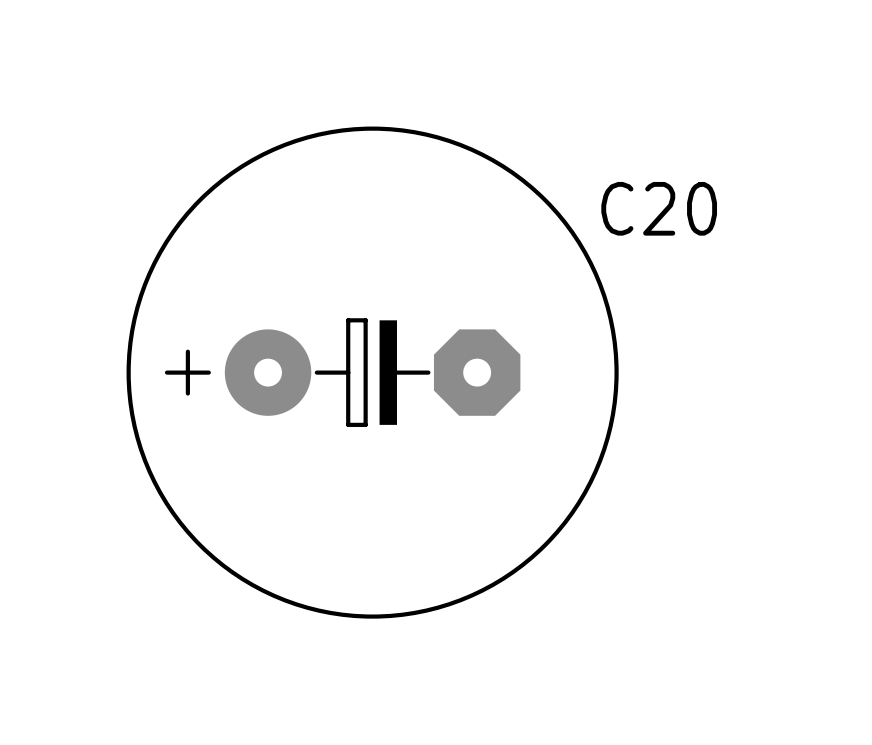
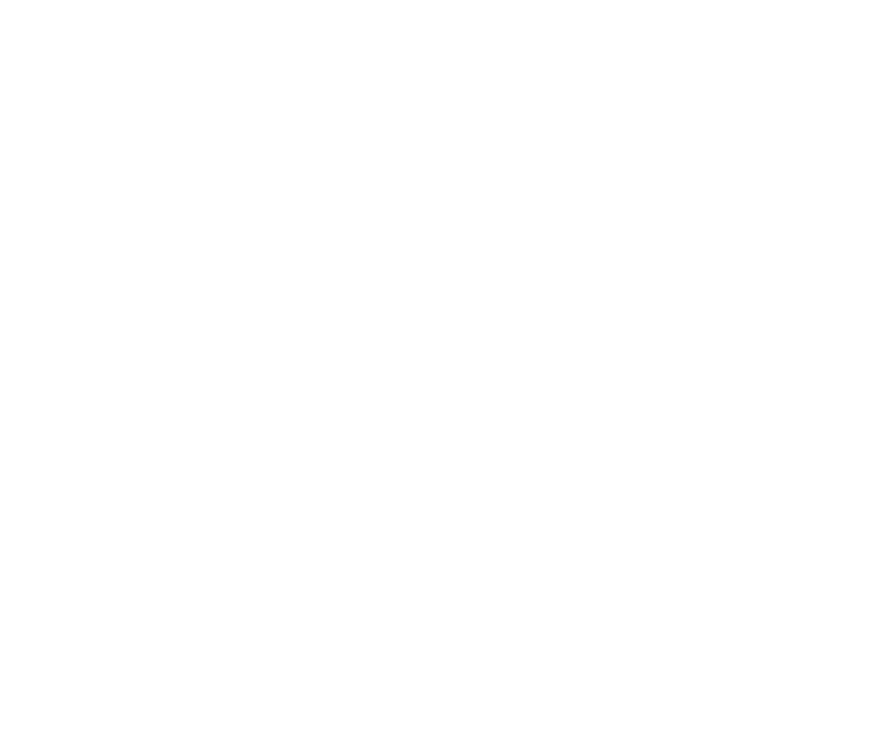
C20: (372, 372) -> none

